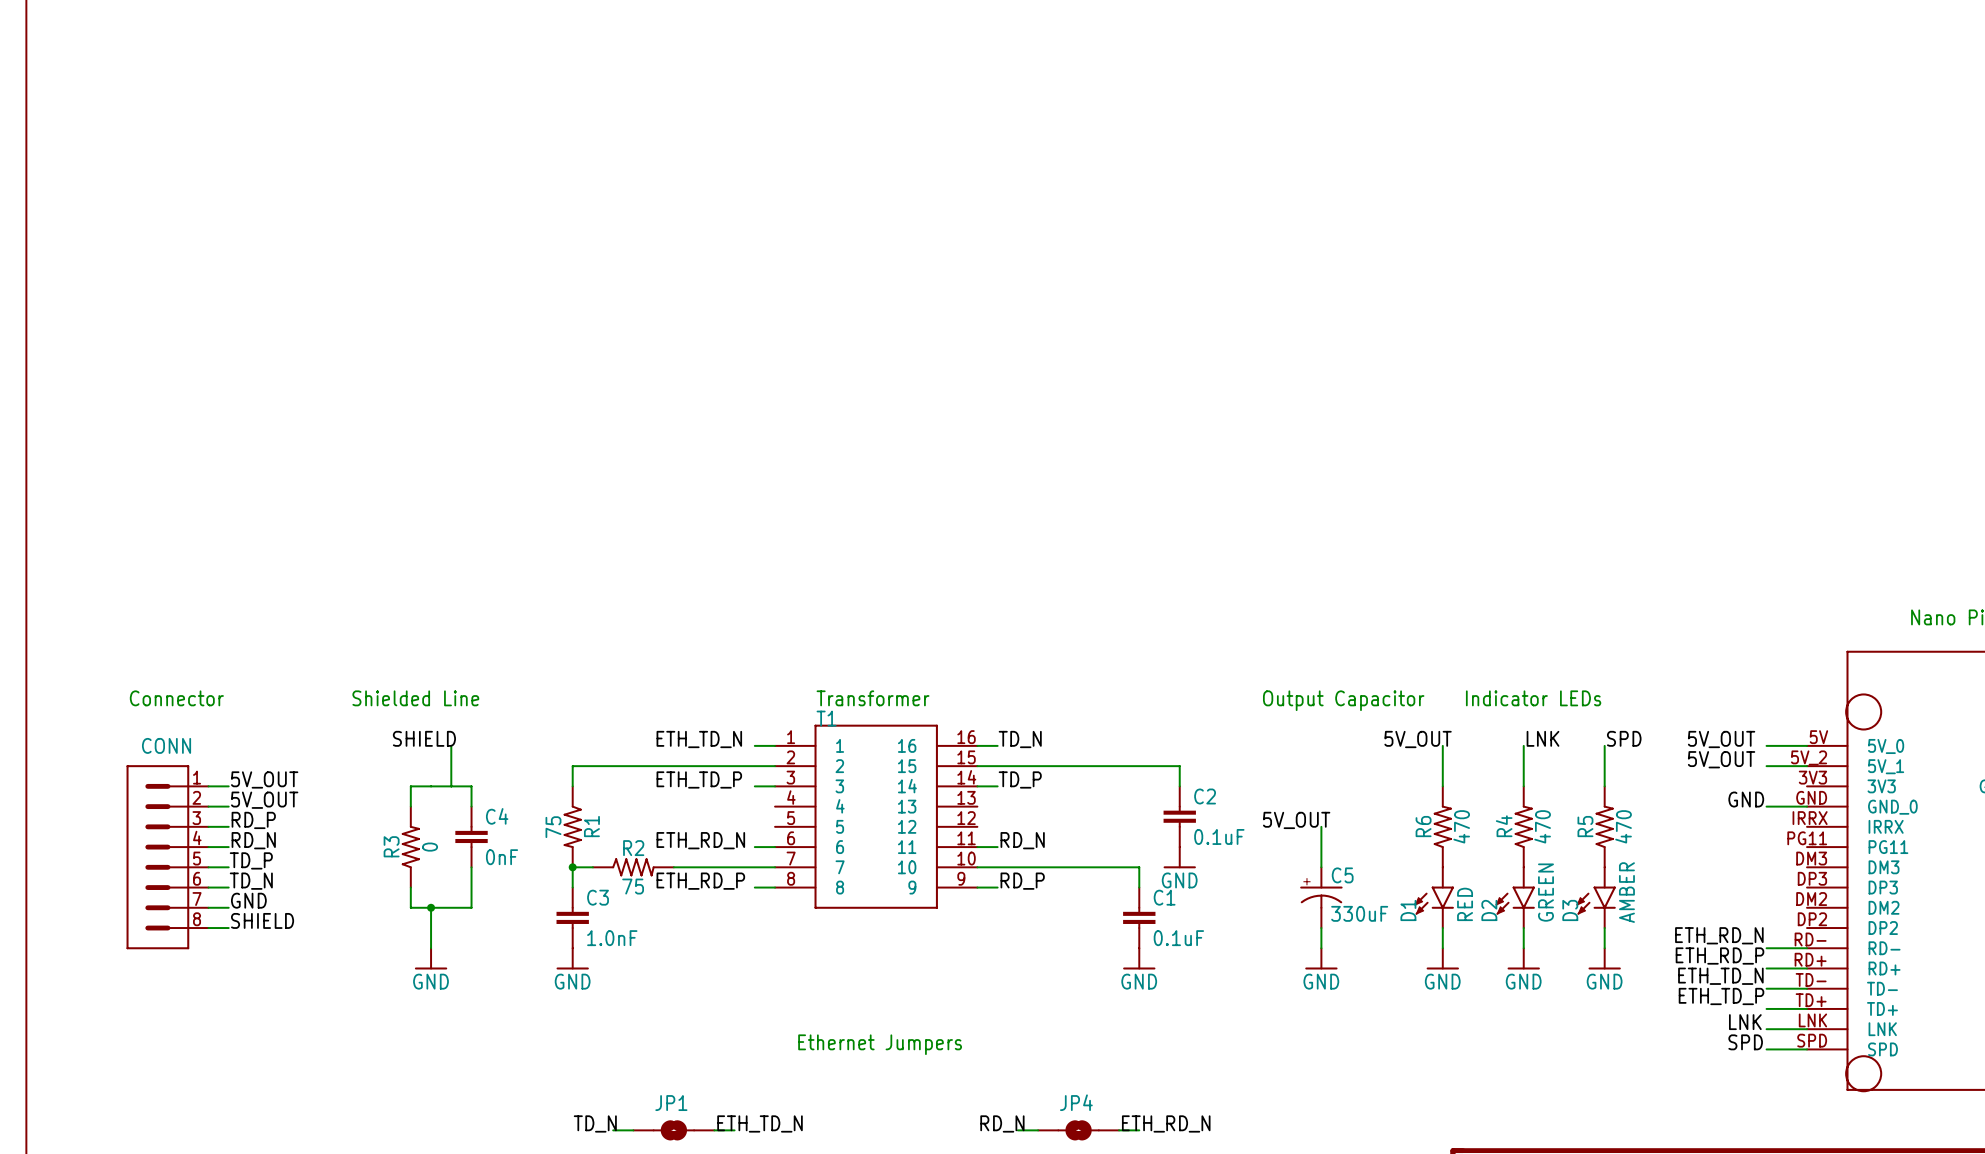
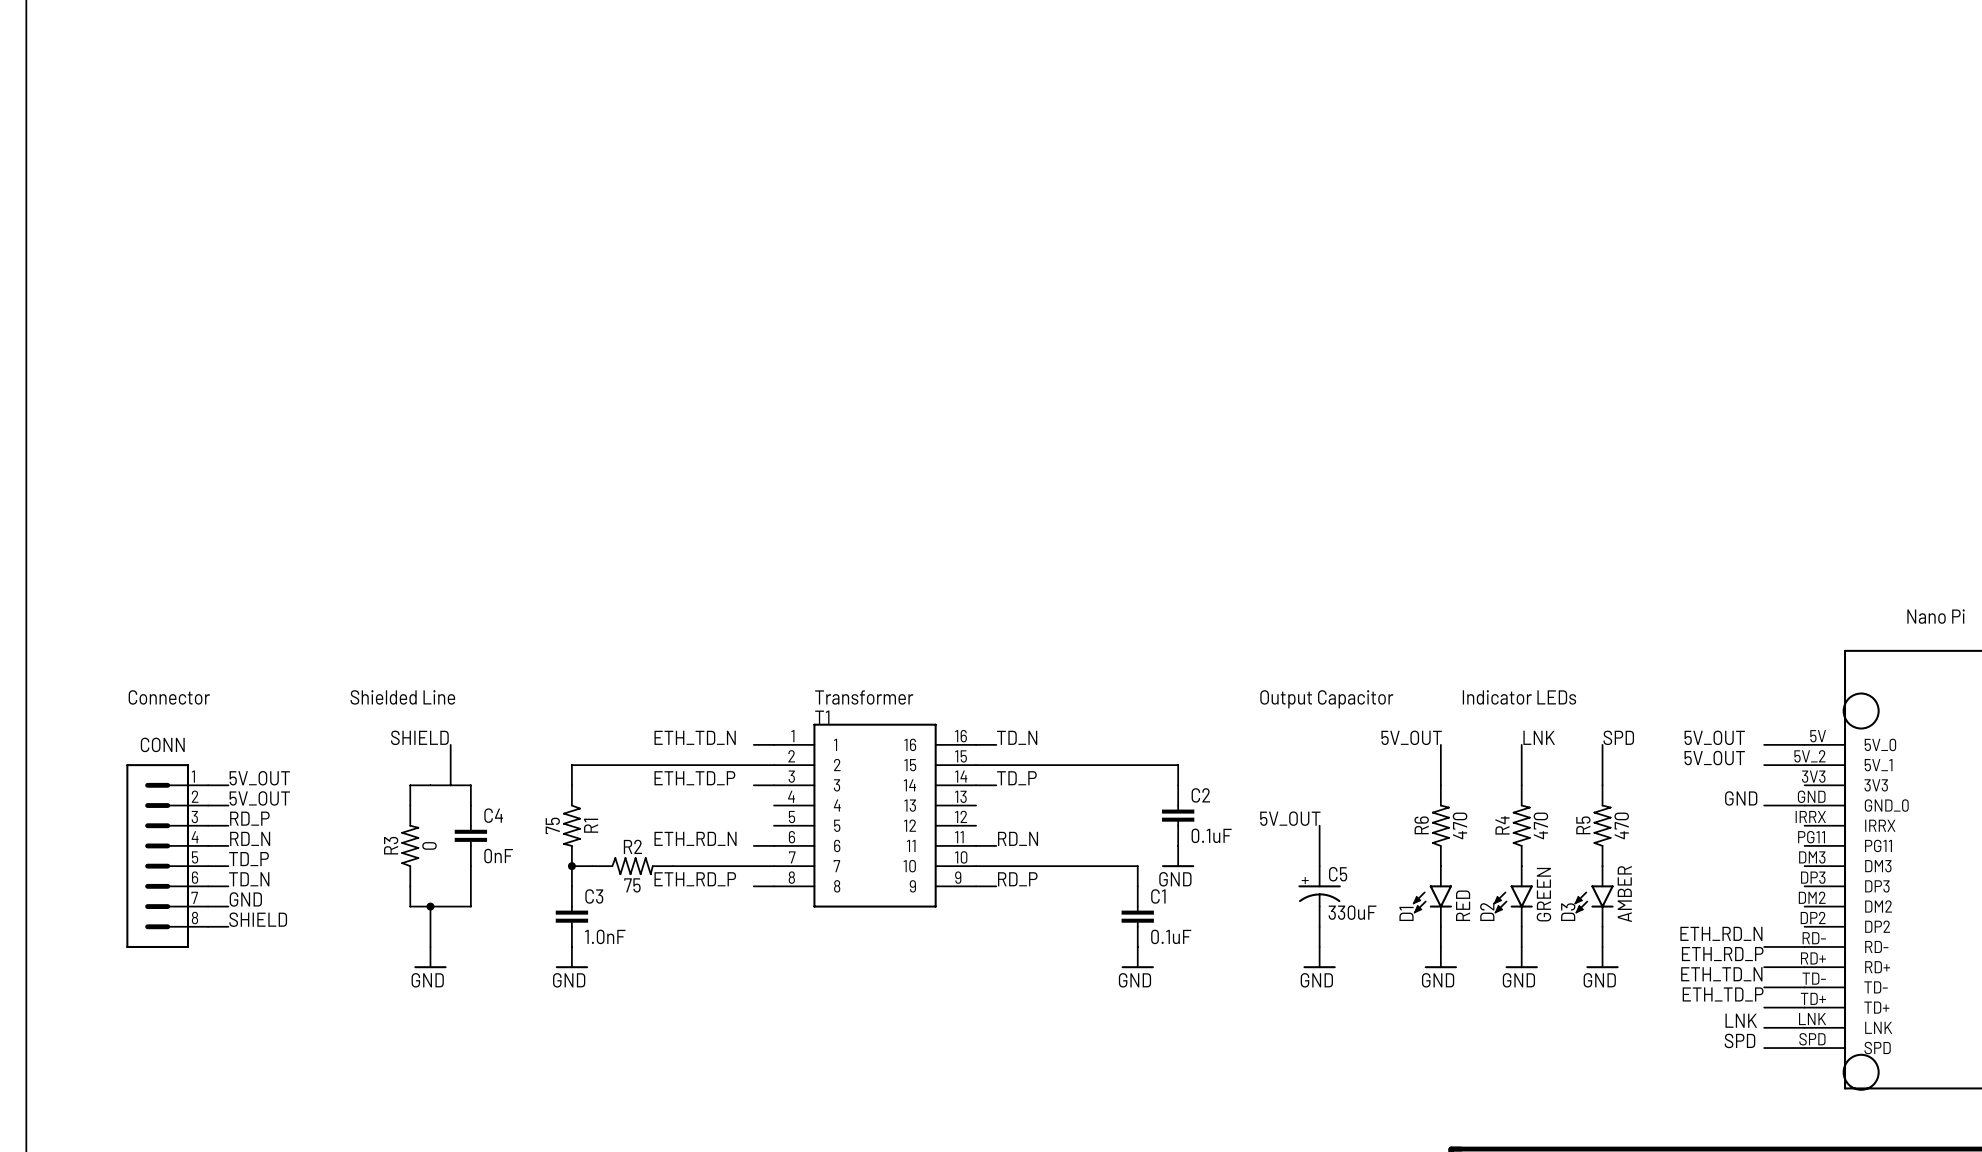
text: Ethernet Jumpers (880, 1044) -> none
label: TD_N (595, 1123) -> none
label: ETH_TD_N (760, 1123) -> none
label: RD_N (1002, 1123) -> none
label: ETH_RD_N (1166, 1123) -> none
wire: (613, 1130) (633, 1130) -> none
JP1: (673, 1130) -> none
wire: (714, 1130) (734, 1130) -> none
wire: (1017, 1130) (1038, 1130) -> none
JP4: (1078, 1130) -> none
wire: (1119, 1130) (1139, 1130) -> none

